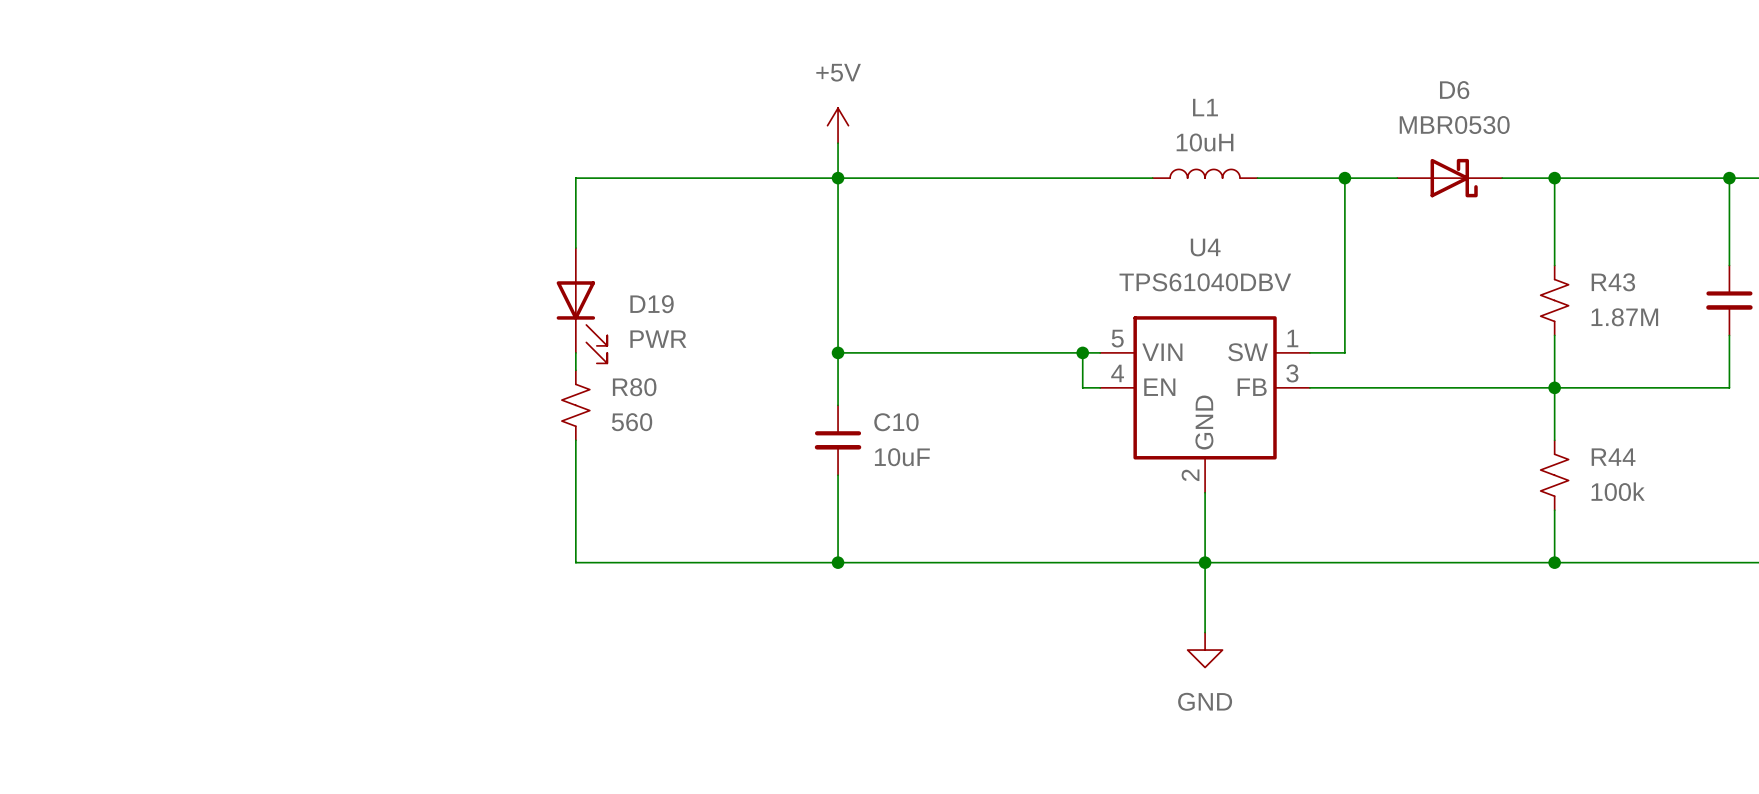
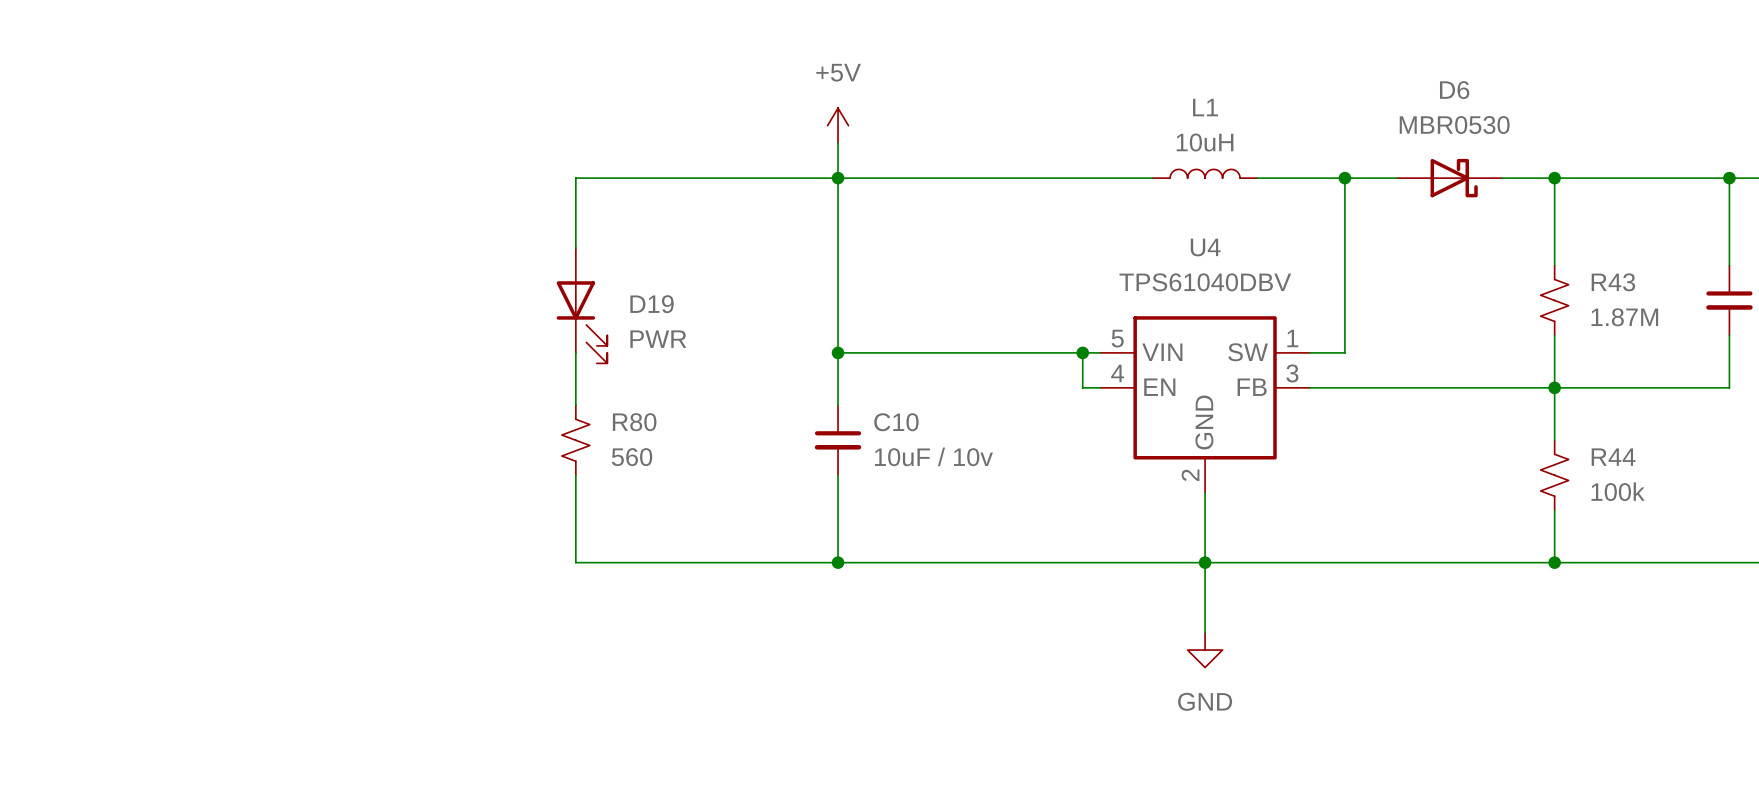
R80 position: (575, 405) -> (575, 440)
C10 value: 10uF (902, 457) -> 10uF / 10v (933, 456)

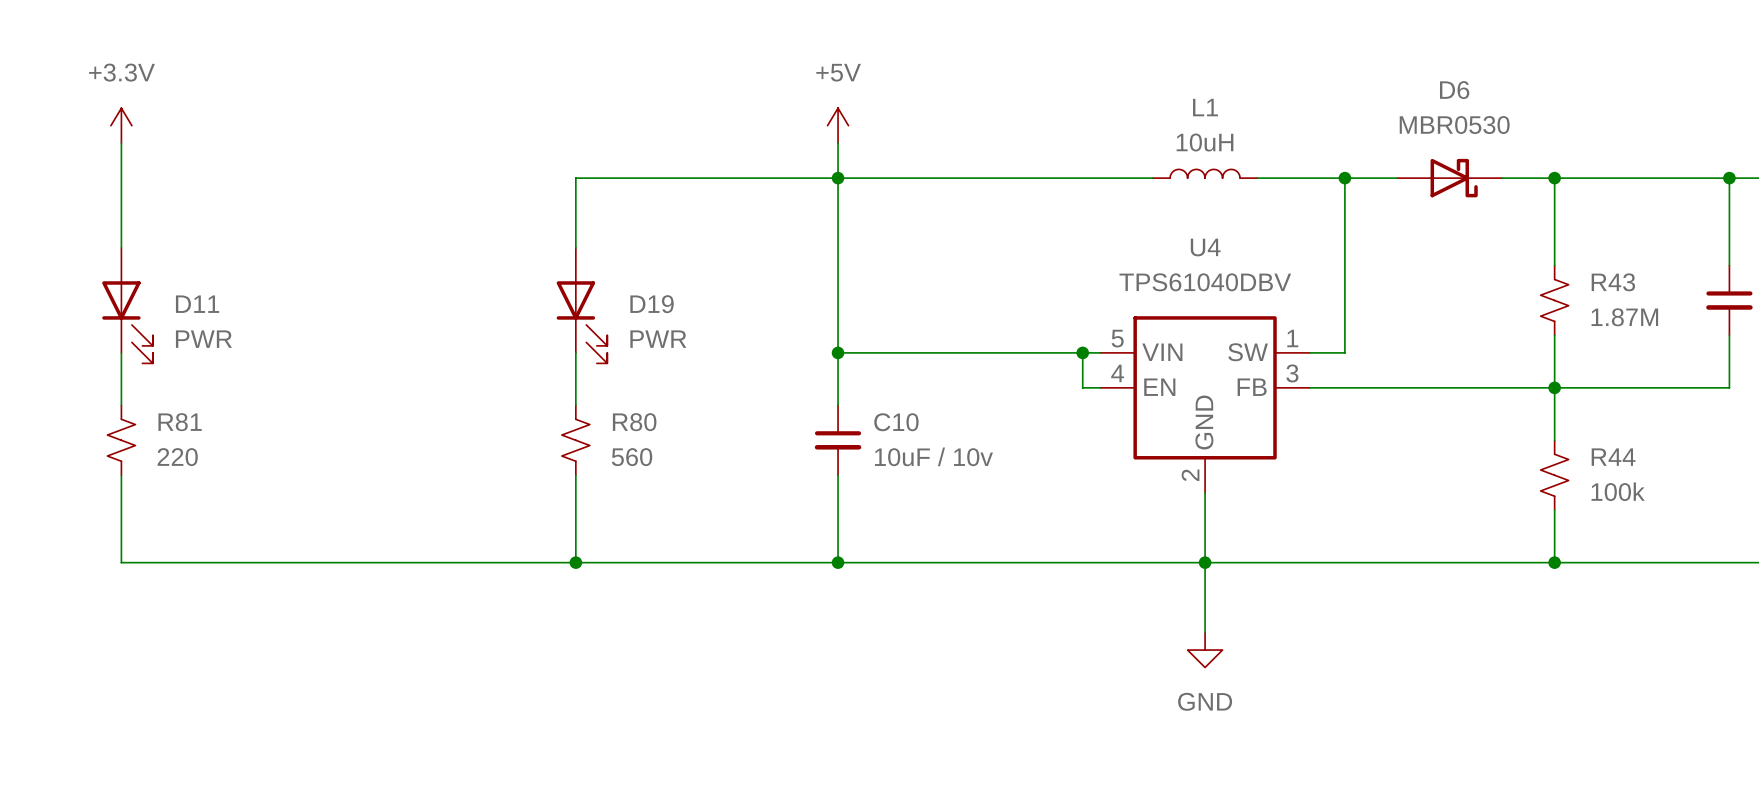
power symbol: none -> +3.3V (121, 125)
wire: none -> (121, 143) (121, 248)
D11: none -> PWR (127, 305)
wire: none -> (121, 352) (121, 405)
R81: none -> 220 (121, 440)
wire: none -> (121, 475) (121, 562) (575, 562)
junction: none -> (575, 562)

